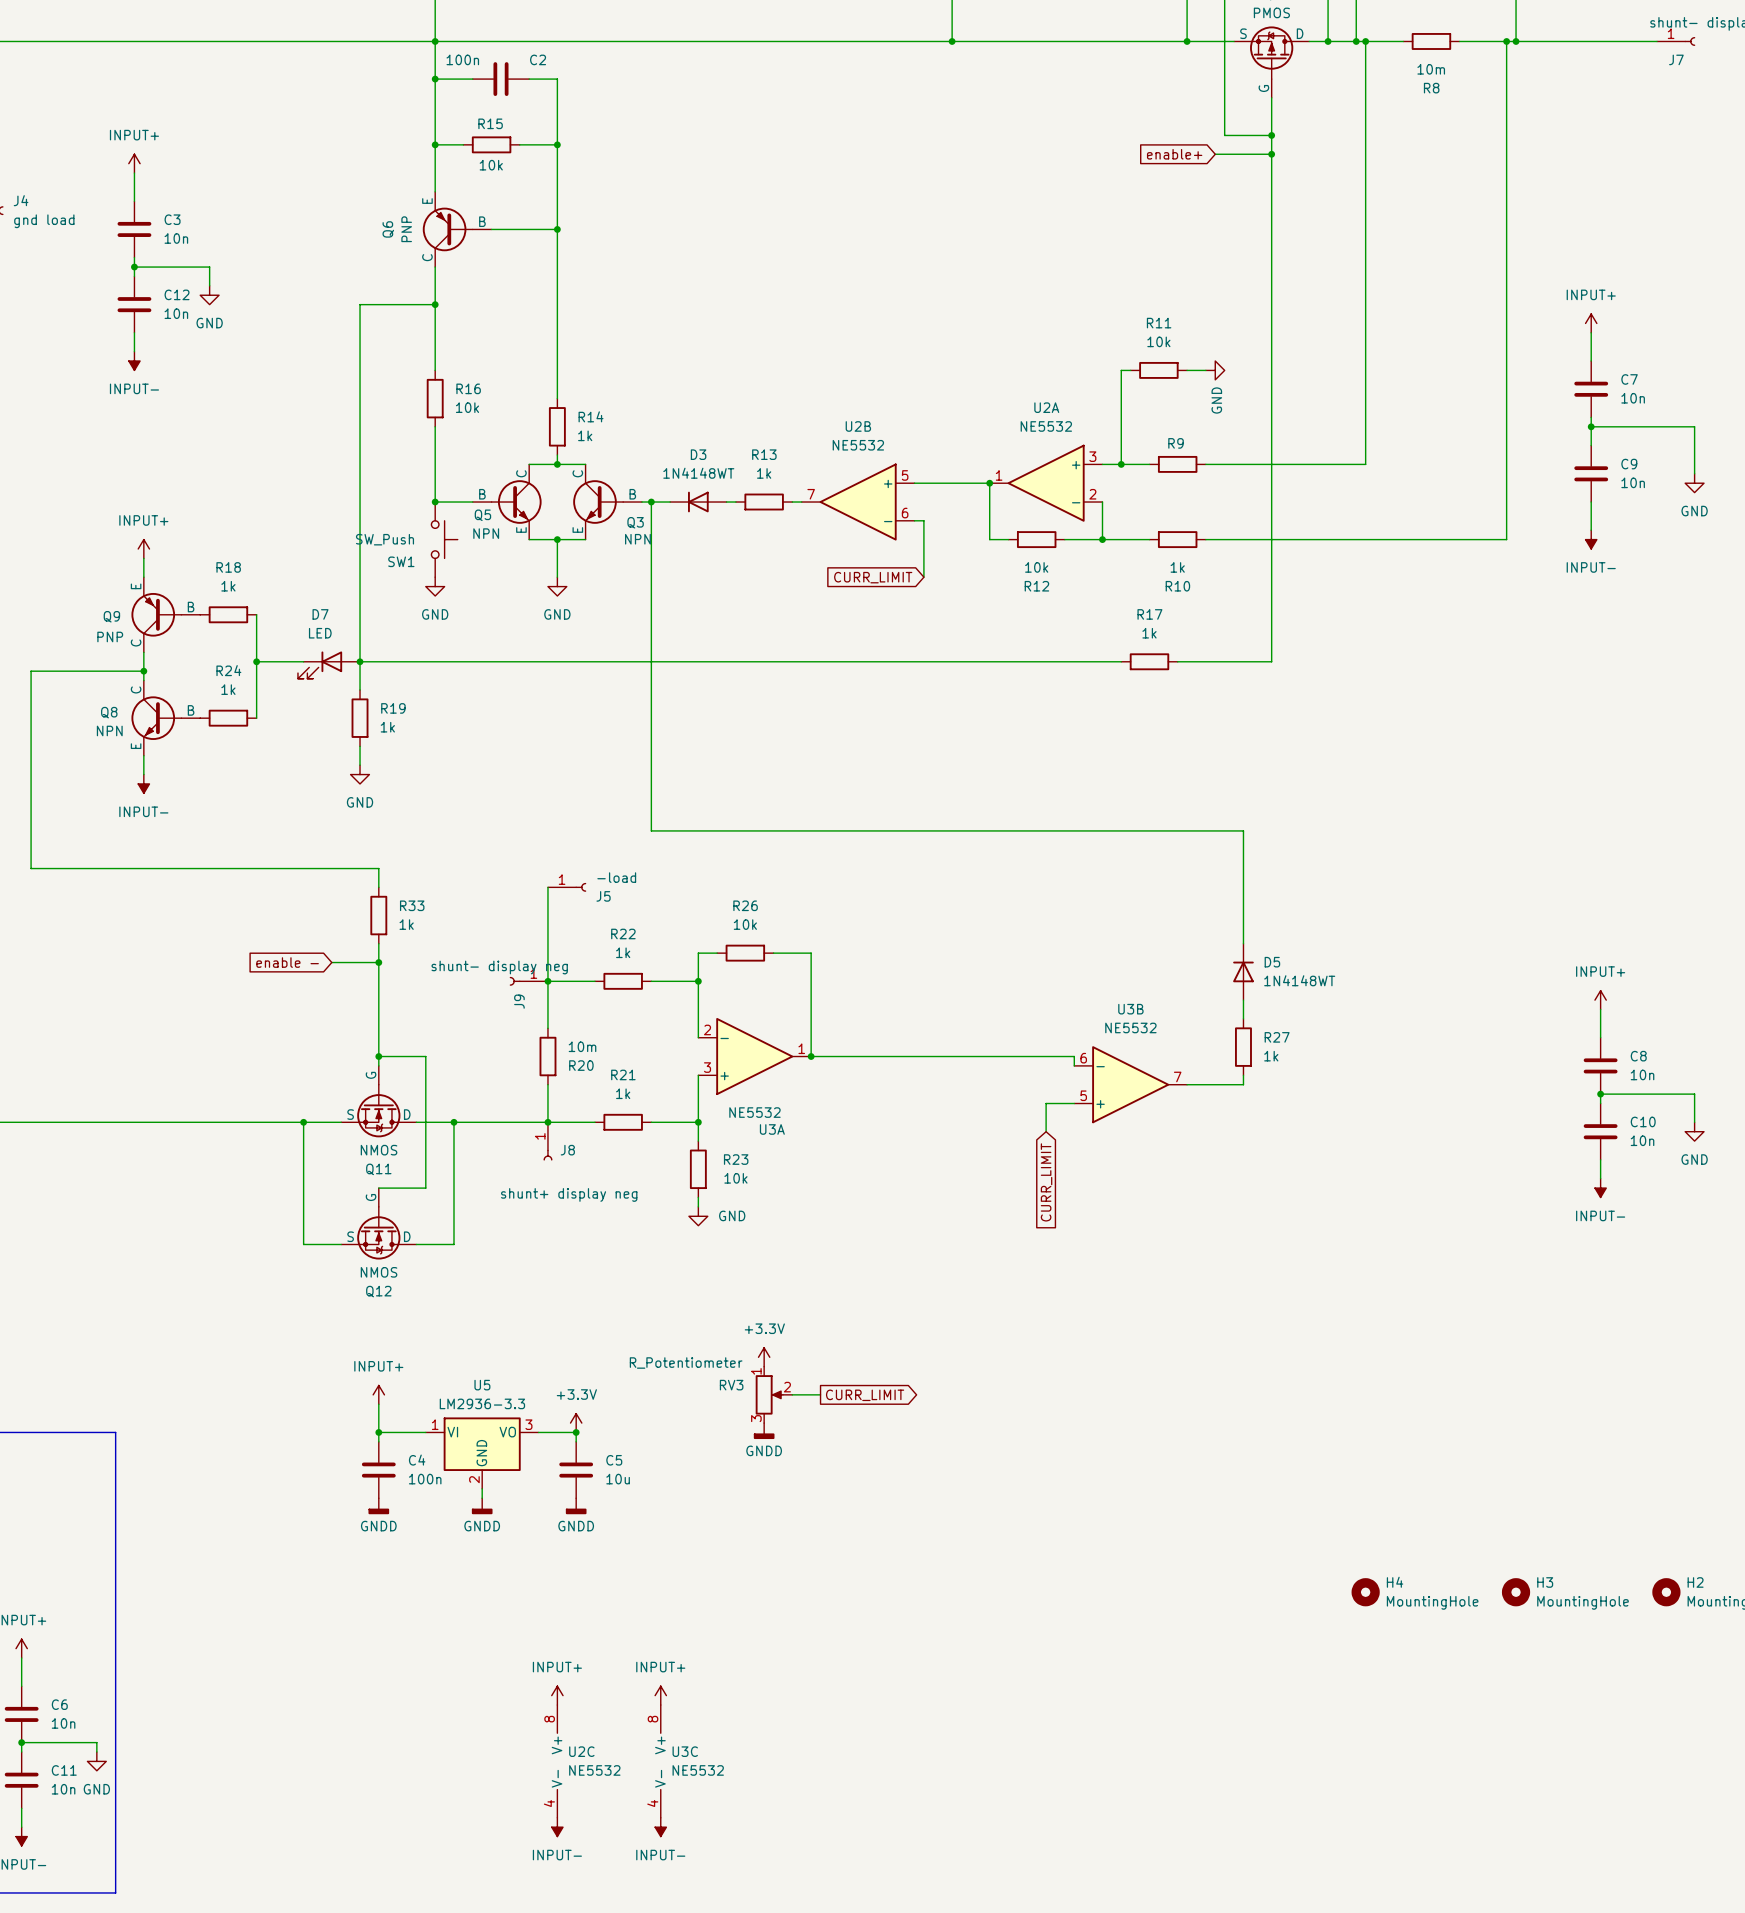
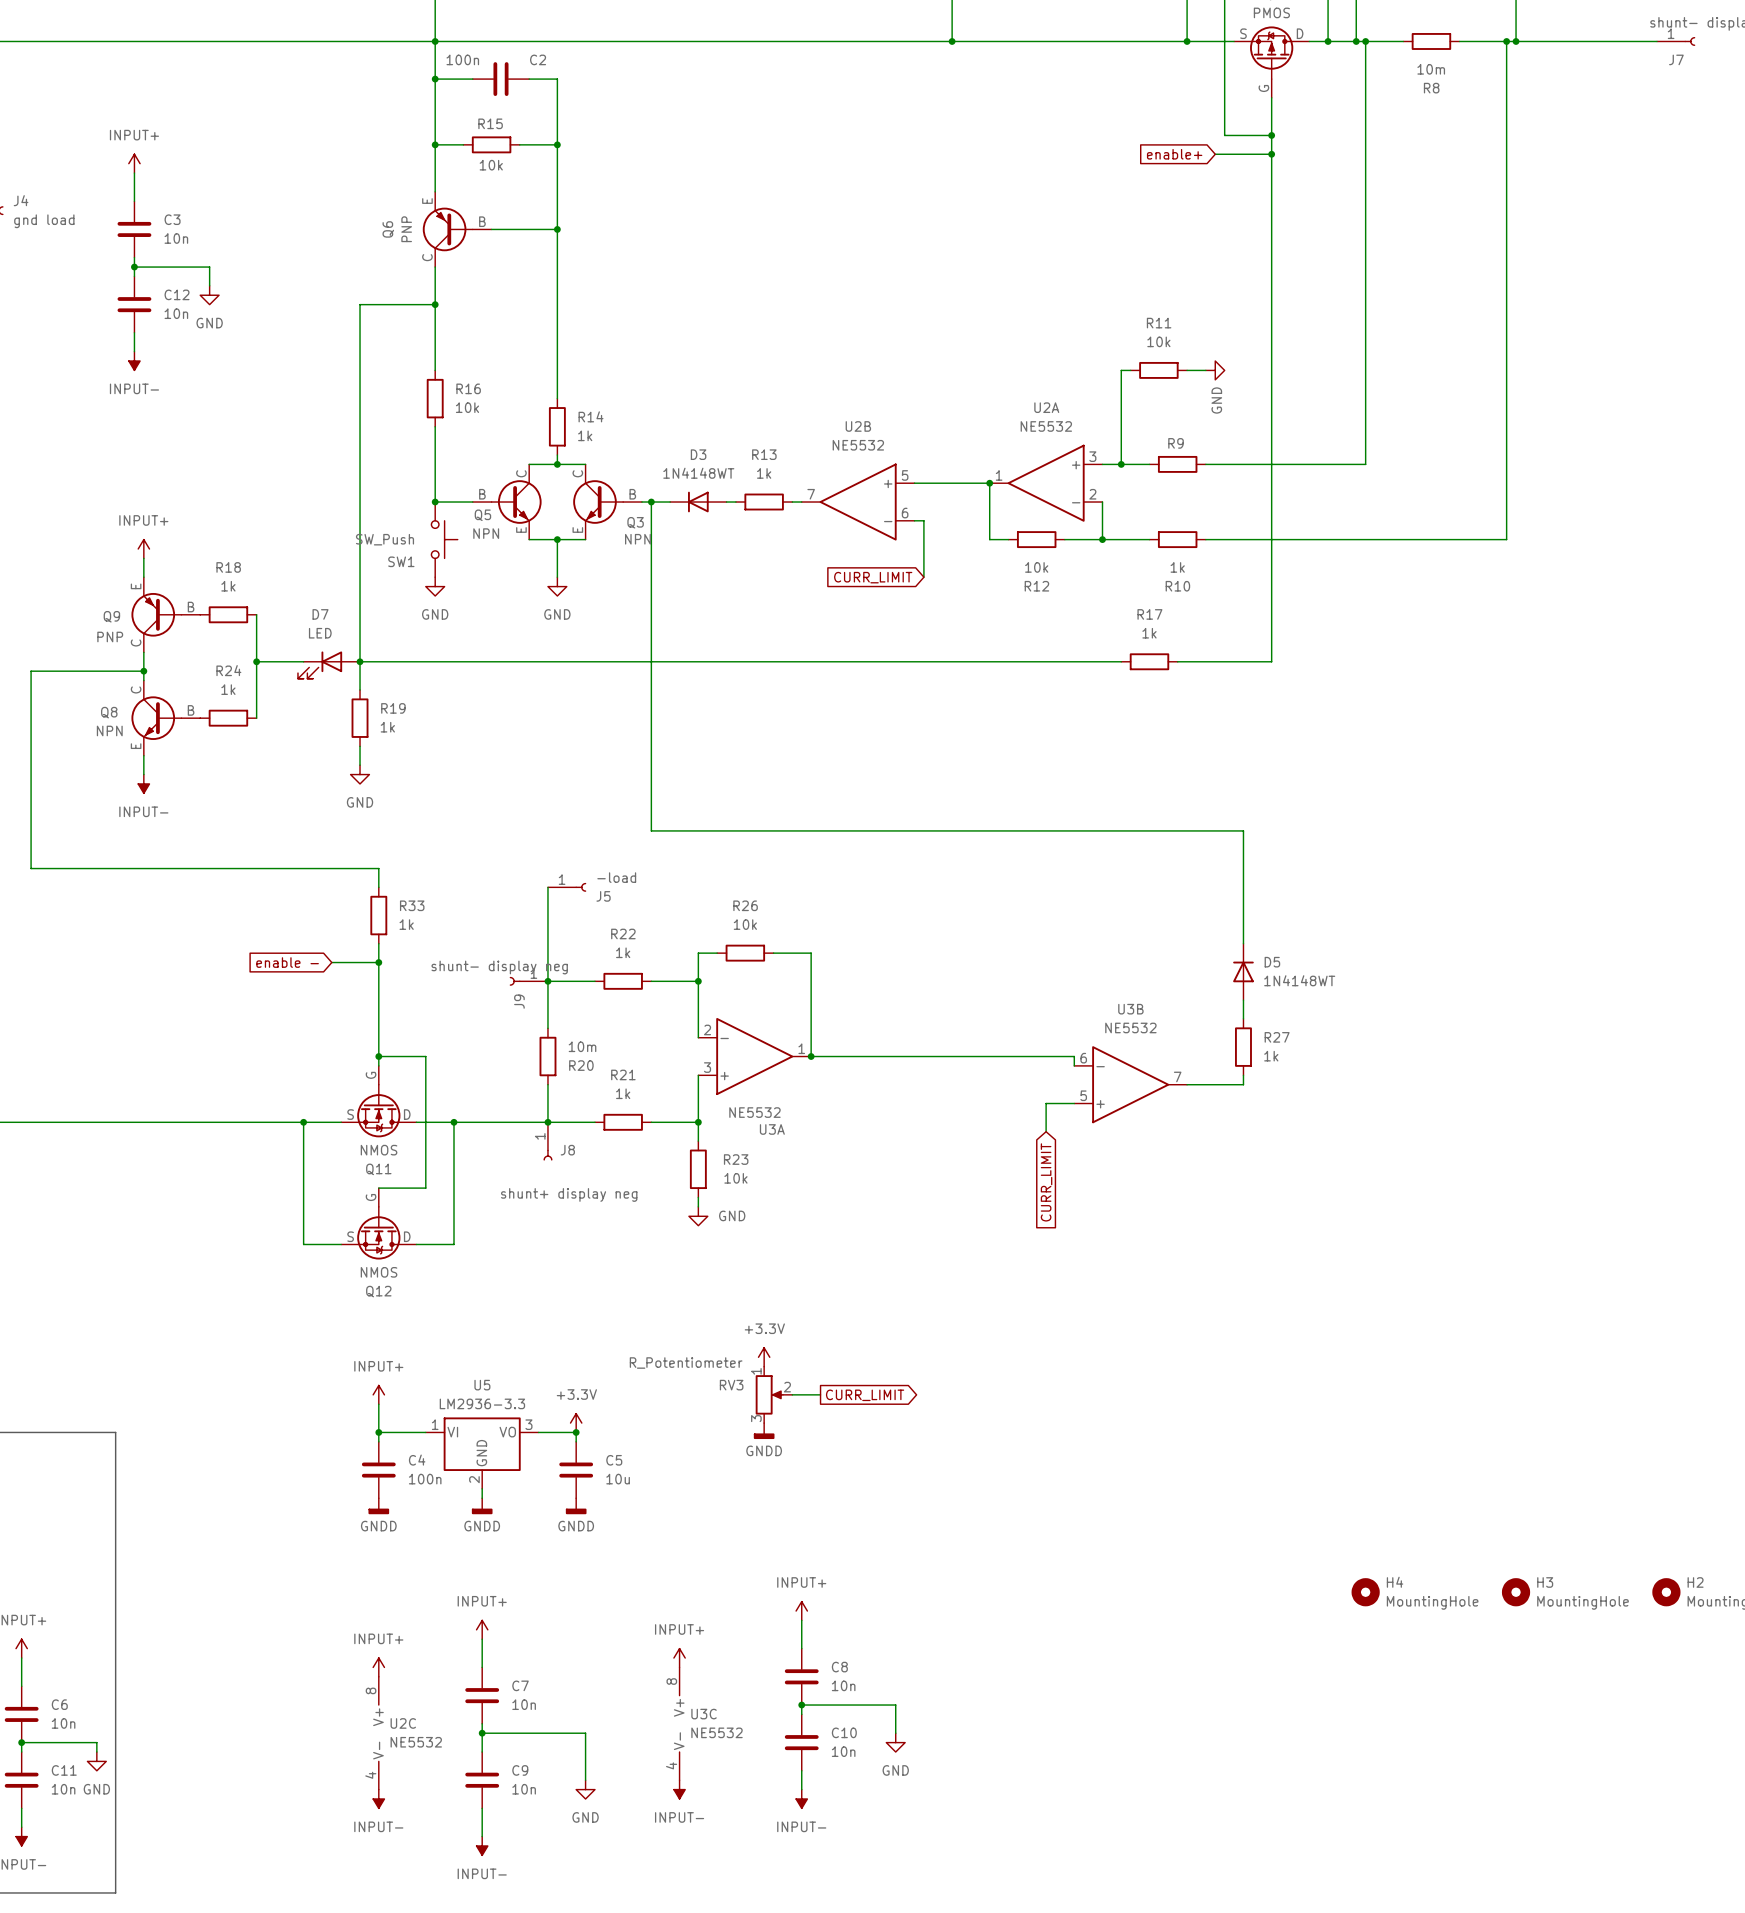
power symbol: INPUT+ (1591, 323) -> none
wire: (1591, 332) (1591, 361) -> none
C7 position: (1591, 389) -> (482, 1695)
wire: (1591, 417) (1591, 445) -> none
wire: (1591, 426) (1694, 426) (1694, 473) -> none
junction: (1591, 426) -> none
C9 position: (1591, 473) -> (482, 1780)
power symbol: GND (1694, 483) -> none
wire: (1591, 502) (1591, 530) -> none
power symbol: INPUT- (1591, 539) -> none
power symbol: INPUT+ (1600, 1000) -> none
wire: (1600, 1009) (1600, 1037) -> none
C8 position: (1600, 1065) -> (801, 1676)
junction: (1600, 1094) -> none
wire: (1600, 1103) (1600, 1094) (1694, 1094) (1694, 1122) -> none
C10 position: (1600, 1131) -> (801, 1742)
power symbol: GND (1694, 1131) -> none
wire: (1600, 1159) (1600, 1178) -> none
power symbol: INPUT- (1600, 1188) -> none
power symbol: none -> INPUT+ (801, 1611)
wire: none -> (801, 1620) (801, 1648)
power symbol: none -> INPUT+ (482, 1629)
wire: none -> (482, 1639) (482, 1667)
power symbol: none -> INPUT+ (378, 1667)
power symbol: INPUT+ (557, 1695) -> none
power symbol position: INPUT+ (660, 1695) -> INPUT+ (679, 1658)
junction: none -> (801, 1705)
wire: none -> (801, 1714) (801, 1705) (895, 1705) (895, 1733)
wire: none -> (482, 1723) (482, 1752)
wire: none -> (482, 1733) (585, 1733) (585, 1780)
junction: none -> (482, 1733)
power symbol: none -> GND (895, 1742)
U2C position: (557, 1761) -> (378, 1733)
U3C position: (660, 1761) -> (679, 1723)
wire: none -> (801, 1770) (801, 1789)
power symbol: none -> GND (585, 1789)
power symbol: none -> INPUT- (378, 1799)
power symbol: none -> INPUT- (801, 1799)
wire: none -> (482, 1808) (482, 1836)
power symbol: INPUT- (557, 1827) -> none
power symbol position: INPUT- (660, 1827) -> INPUT- (679, 1789)
power symbol: none -> INPUT- (482, 1845)

